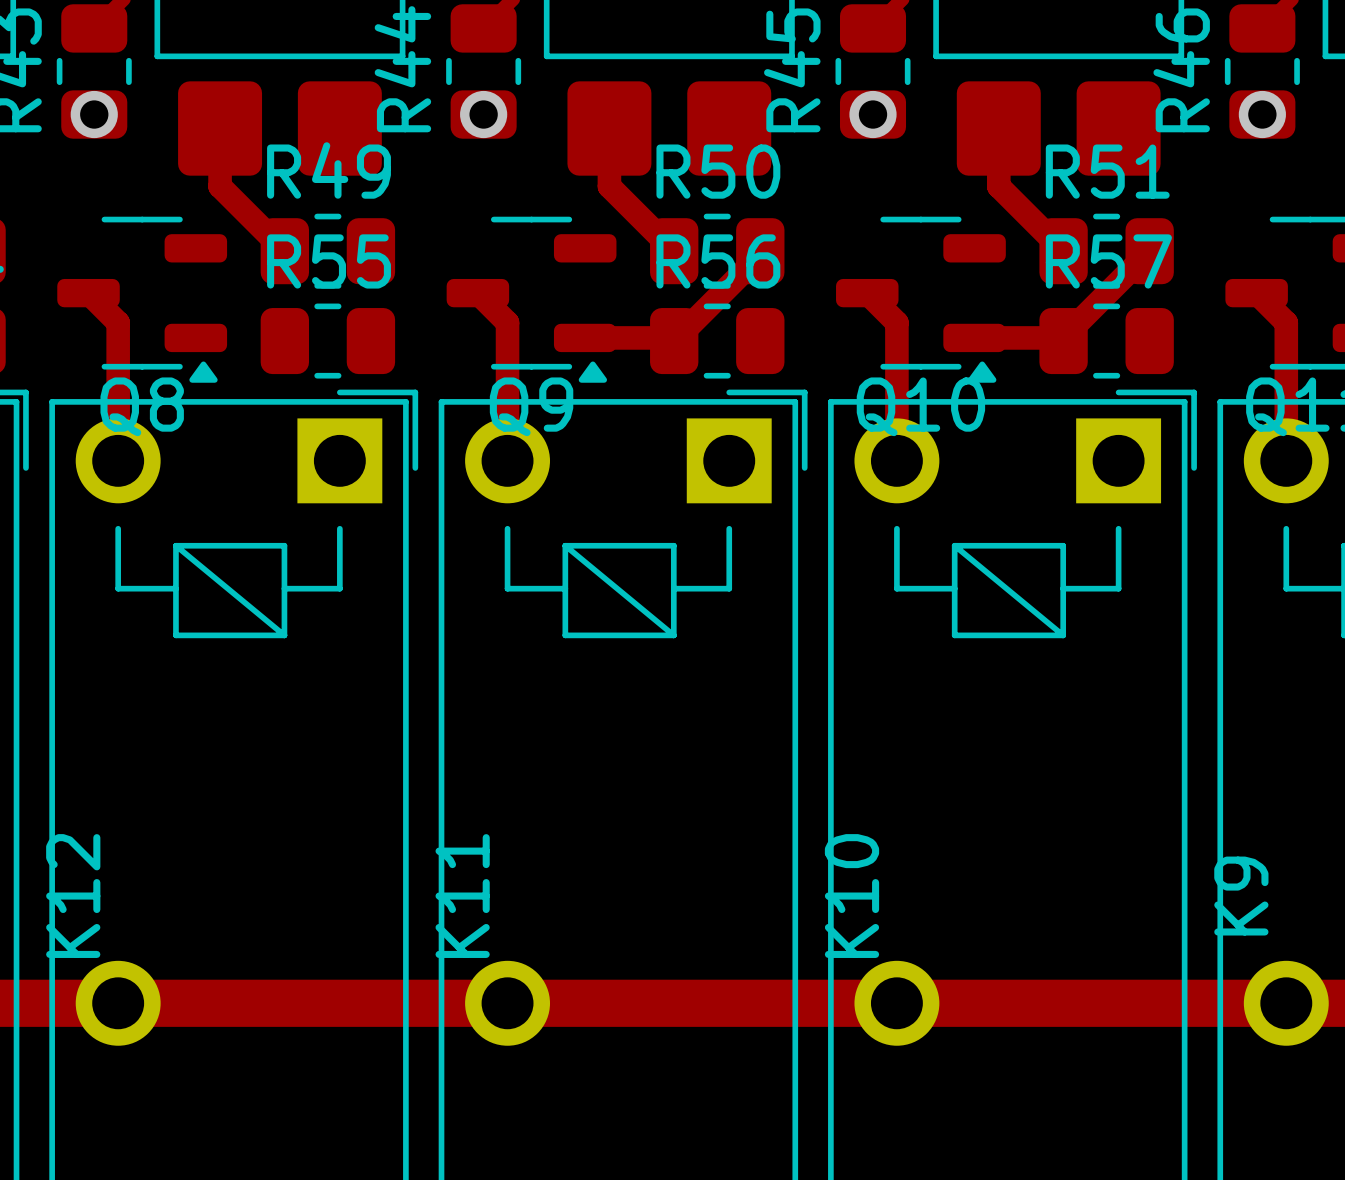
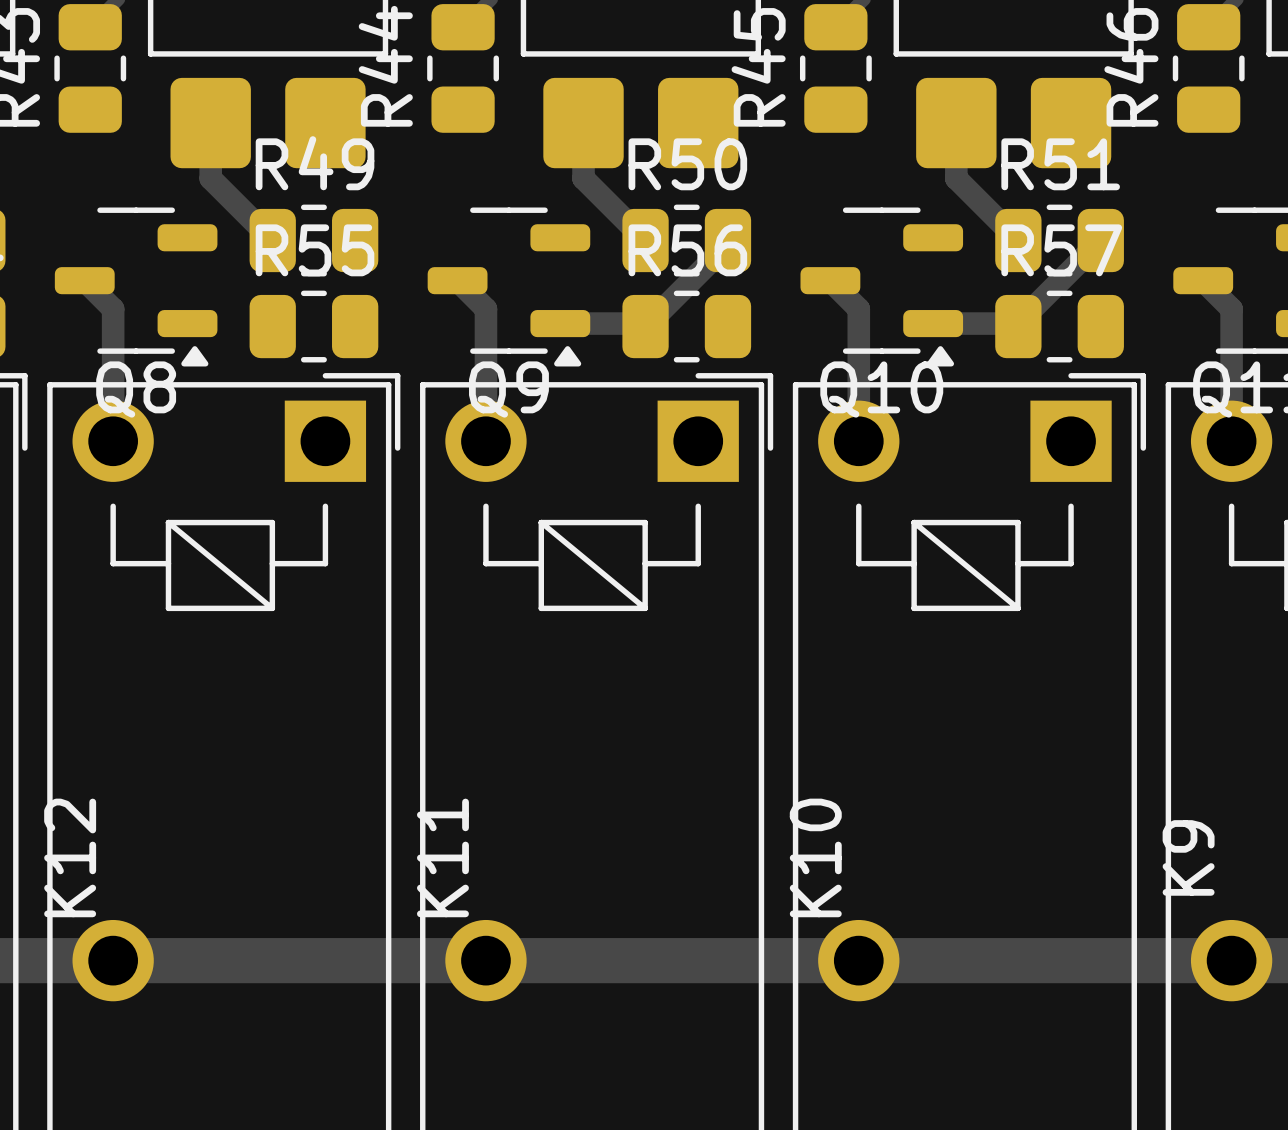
via: (94, 114) -> none
via: (483, 114) -> none
via: (873, 114) -> none
via: (1262, 114) -> none

